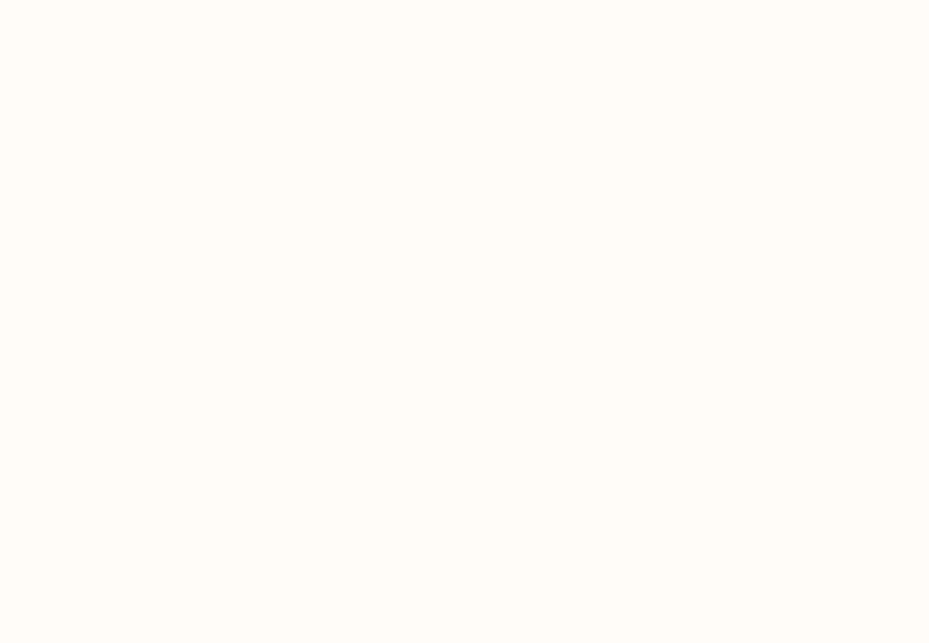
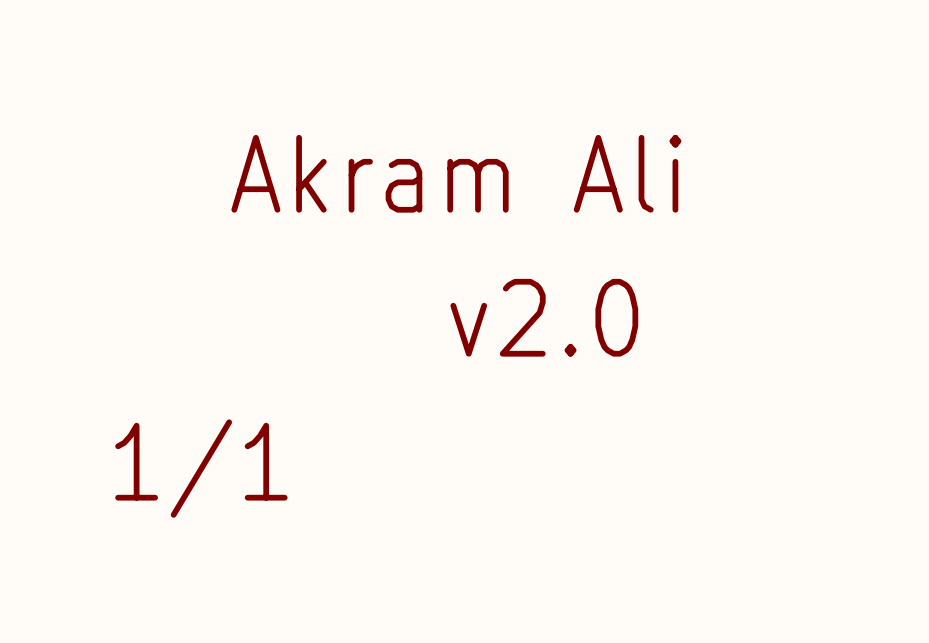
text: none -> Akram Ali (456, 173)
text: none -> v2.0 (544, 317)
text: none -> 1/1 (201, 468)

